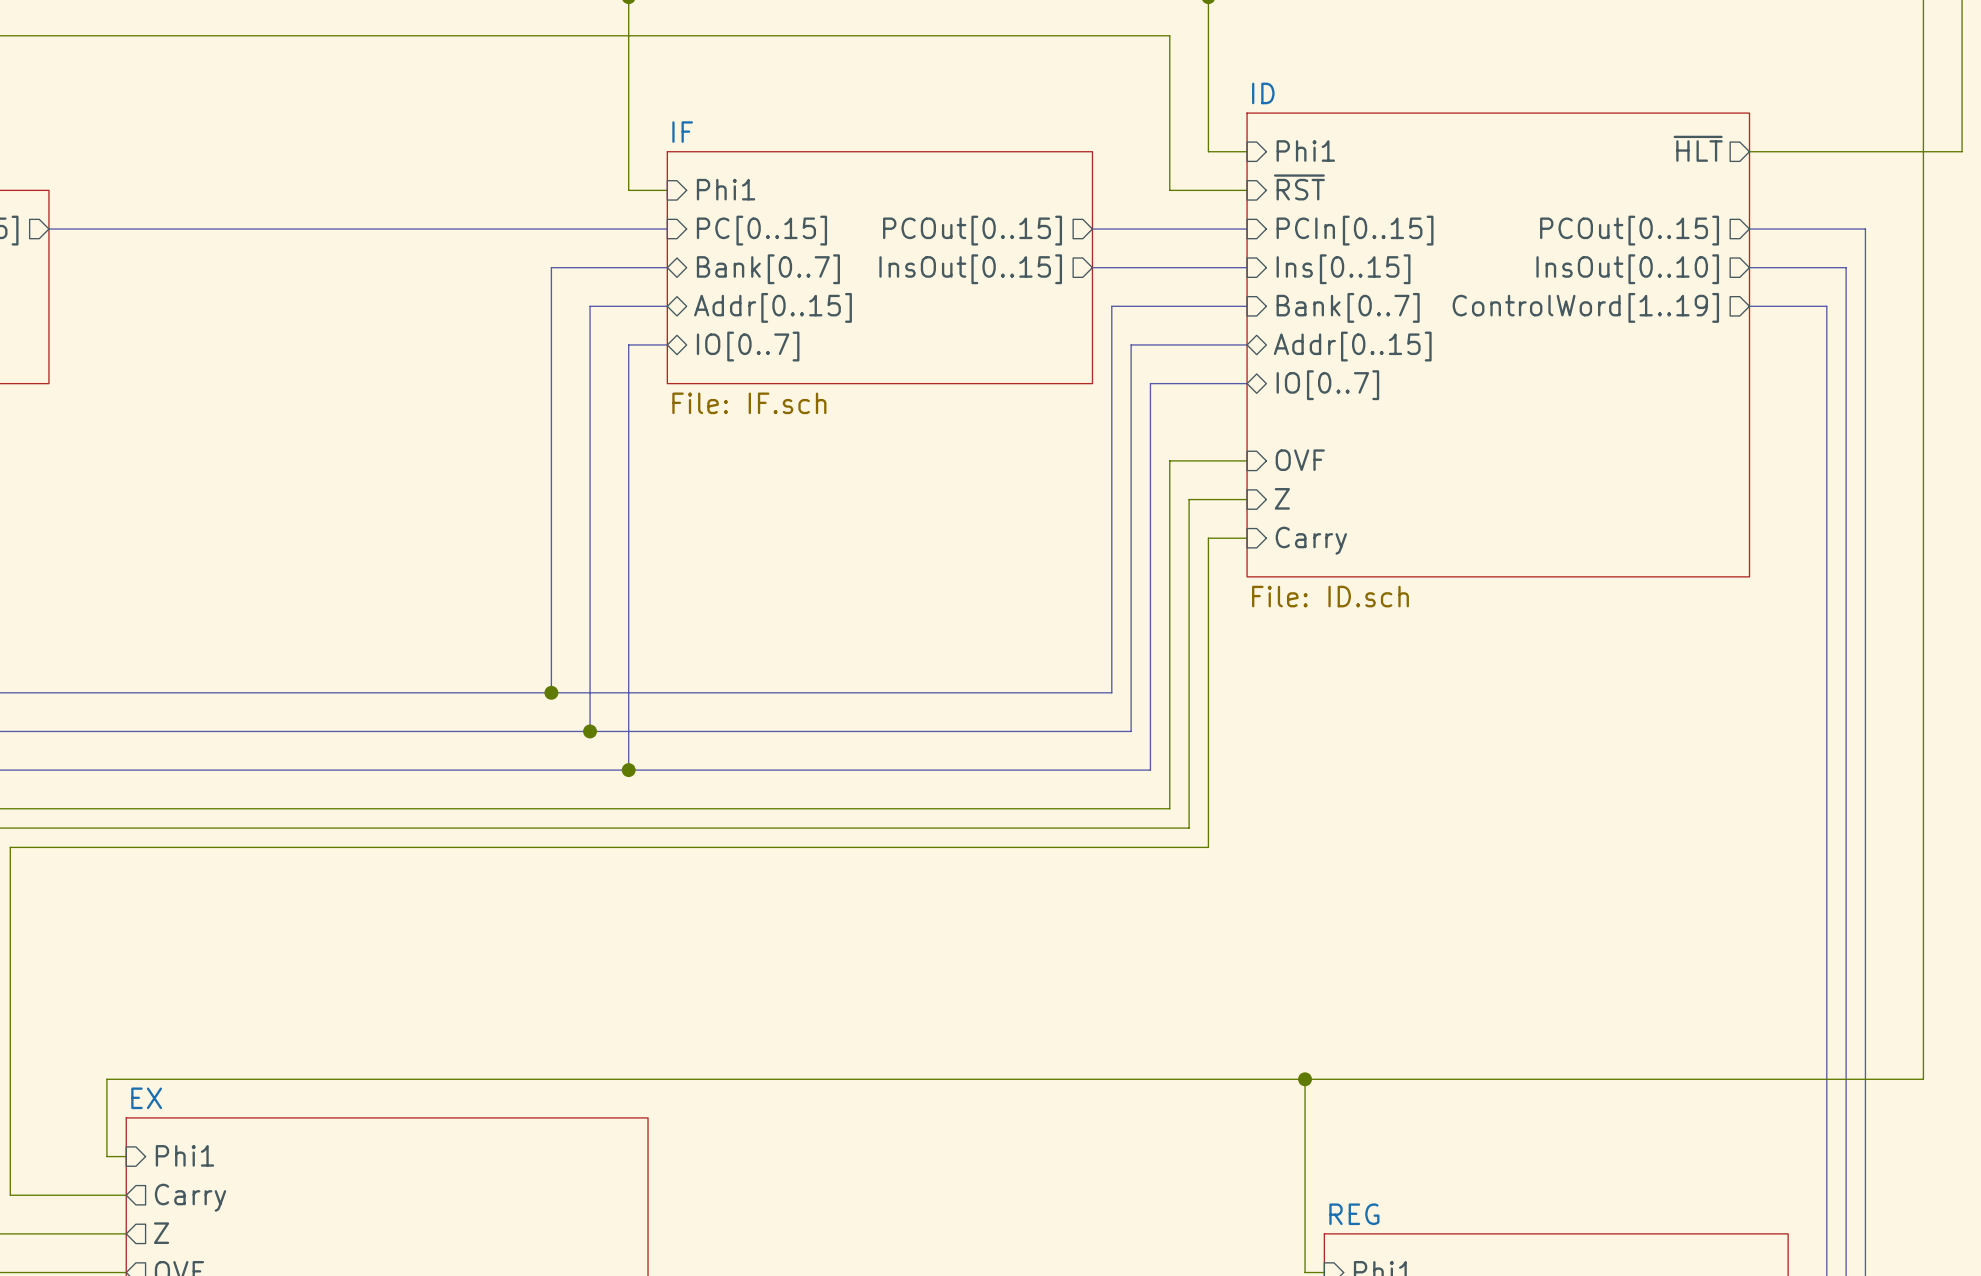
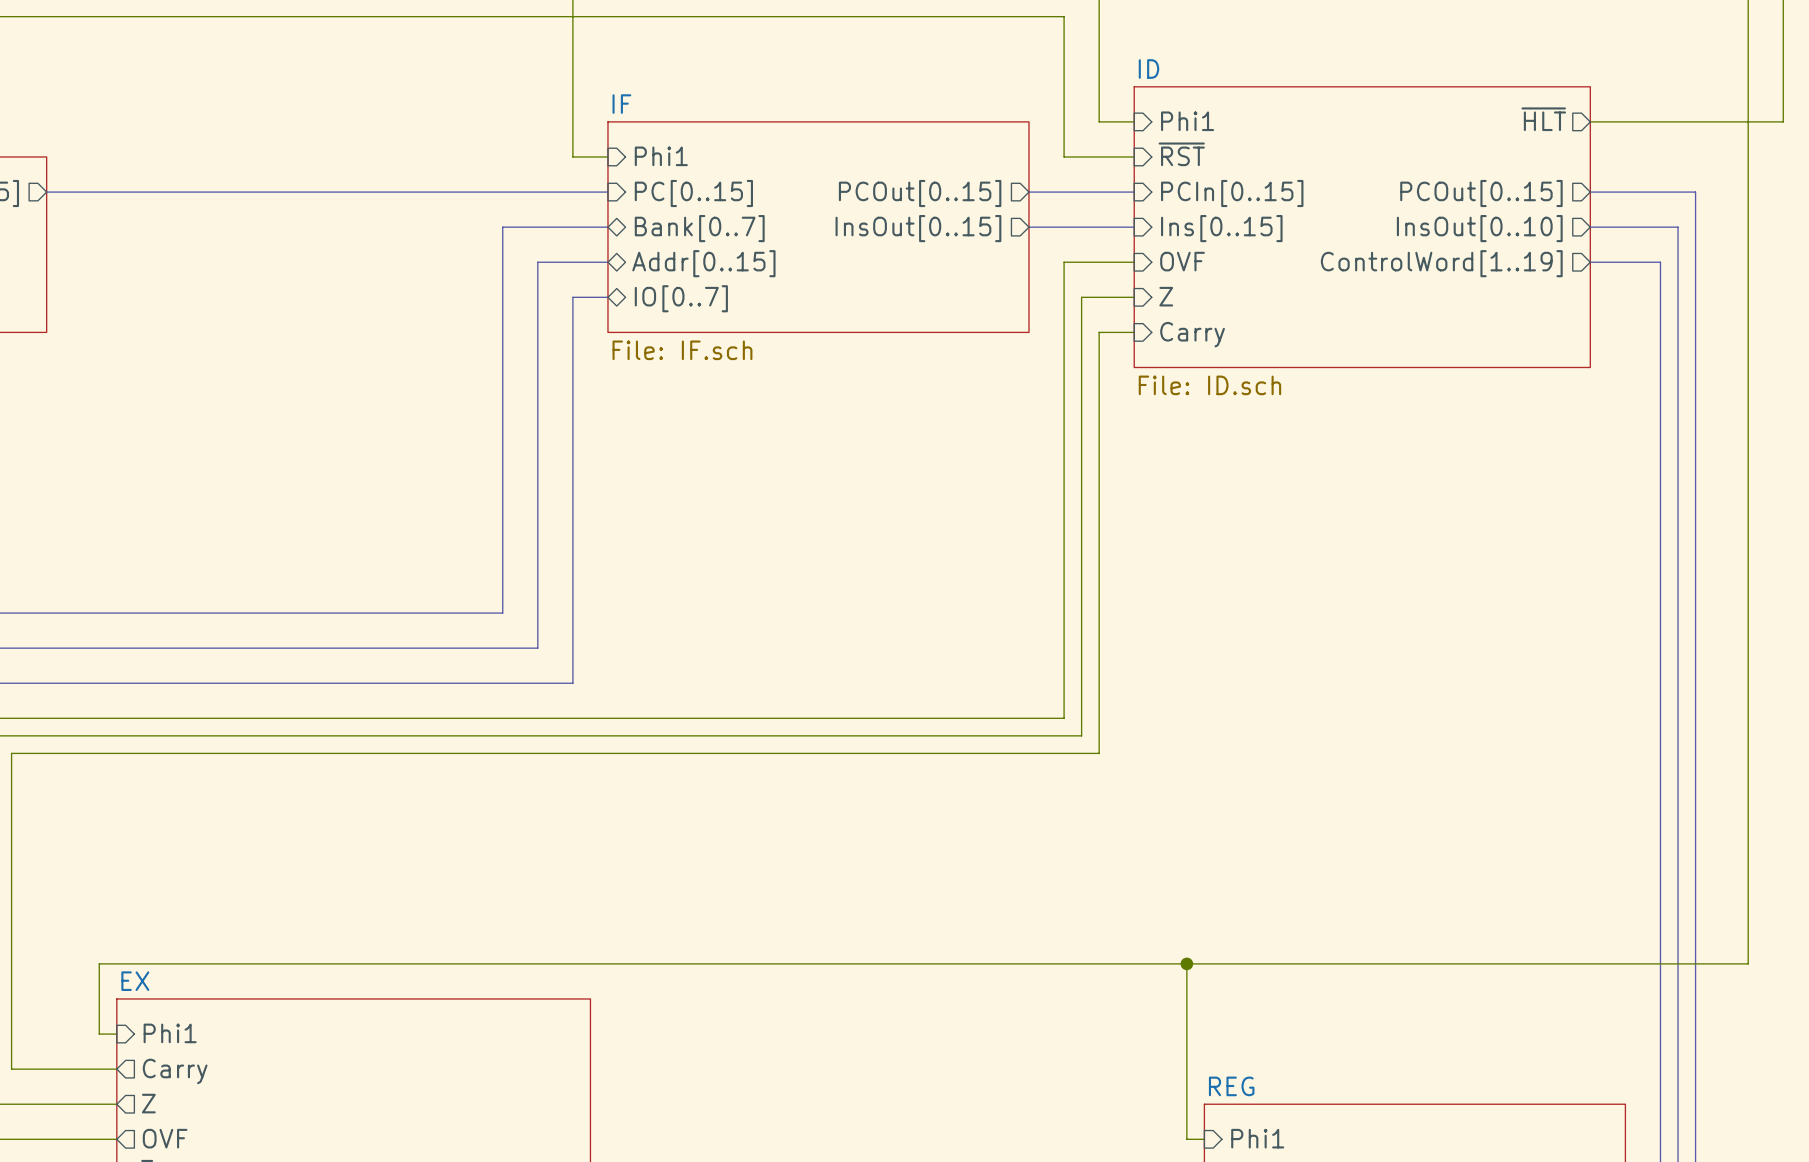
bus: (1092, 229) (1131, 229) -> none
sheet pin position: PCOut[0..15] (972, 230) -> PCOut[0..15] (920, 193)
sheet IF: File: IF.sch (879, 267) -> none
sheet IF: none -> File: IF.sch (818, 227)
bus: (1092, 267) (1131, 267) -> none
sheet ID: none -> File: ID.sch (1362, 227)
sheet pin position: InsOut[0..15] (970, 269) -> InsOut[0..15] (918, 228)
bus: (1247, 306) (1111, 306) (1111, 692) (551, 692) -> none
sheet pin: Bank[0..7] (1348, 307) -> OVF (1182, 261)
bus: (1247, 344) (1131, 344) (1131, 731) (590, 731) -> none
sheet ID: File: ID.sch (1498, 344) -> none
sheet pin shape: bidirectional (1352, 346) -> input (1166, 296)
sheet pin: Addr[0..15] (1352, 346) -> Z (1166, 296)
bus: (1247, 383) (1150, 383) (1150, 770) (628, 770) -> none
sheet pin shape: bidirectional (1327, 385) -> input (1192, 334)
sheet pin: IO[0..7] (1327, 385) -> Carry (1192, 334)
wire: (1169, 460) (1247, 460) -> (1064, 402) (1064, 262) (1134, 262)
sheet pin: OVF (1300, 460) -> none
sheet pin: Z (1282, 498) -> none
wire: (1189, 499) (1247, 499) -> (1081, 437) (1081, 297) (1134, 297)
wire: (1208, 538) (1247, 538) -> (1099, 472) (1099, 332) (1134, 332)
sheet pin: Carry (1311, 540) -> none
junction: (551, 692) -> none
junction: (590, 731) -> none
junction: (628, 770) -> none

